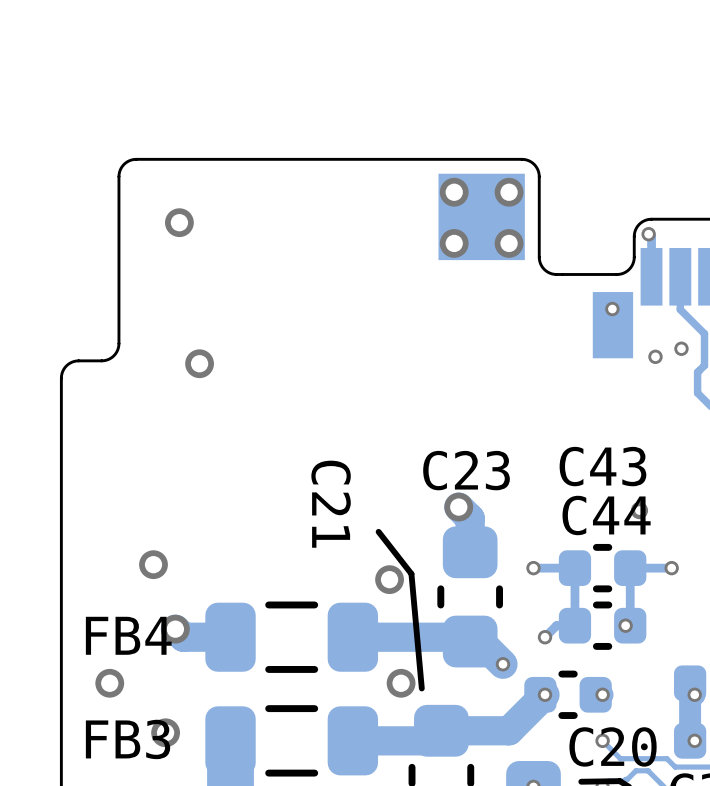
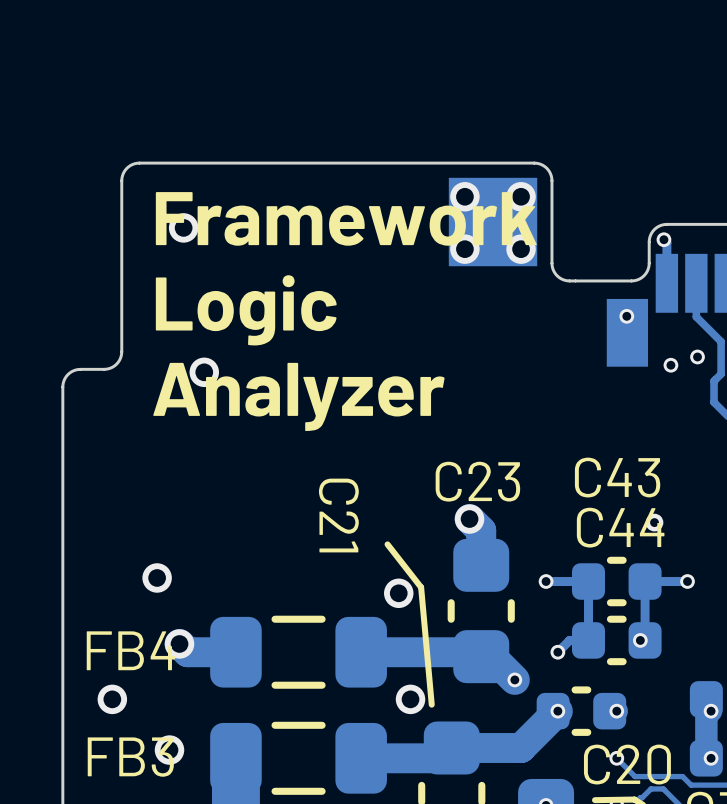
text: none -> Framework (346, 218)
text: none -> Logic (246, 310)
text: none -> Analyzer (298, 396)

